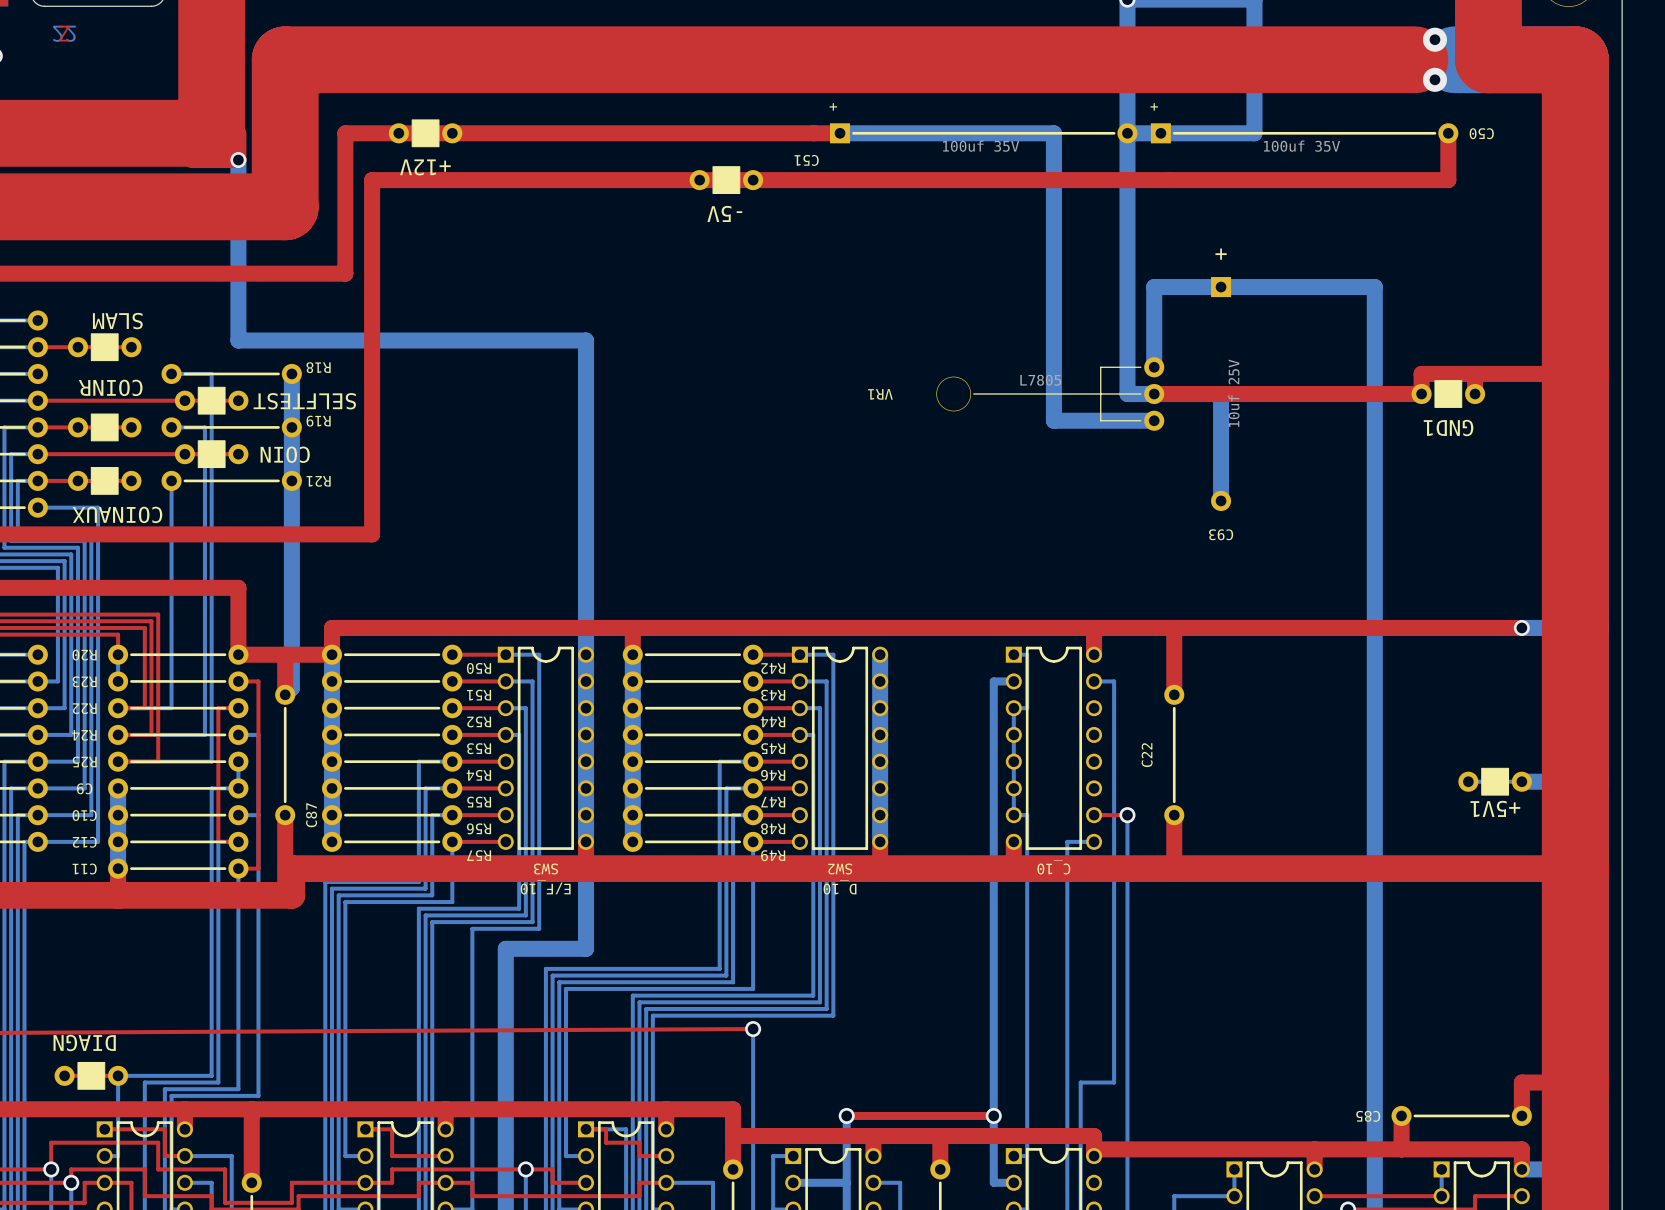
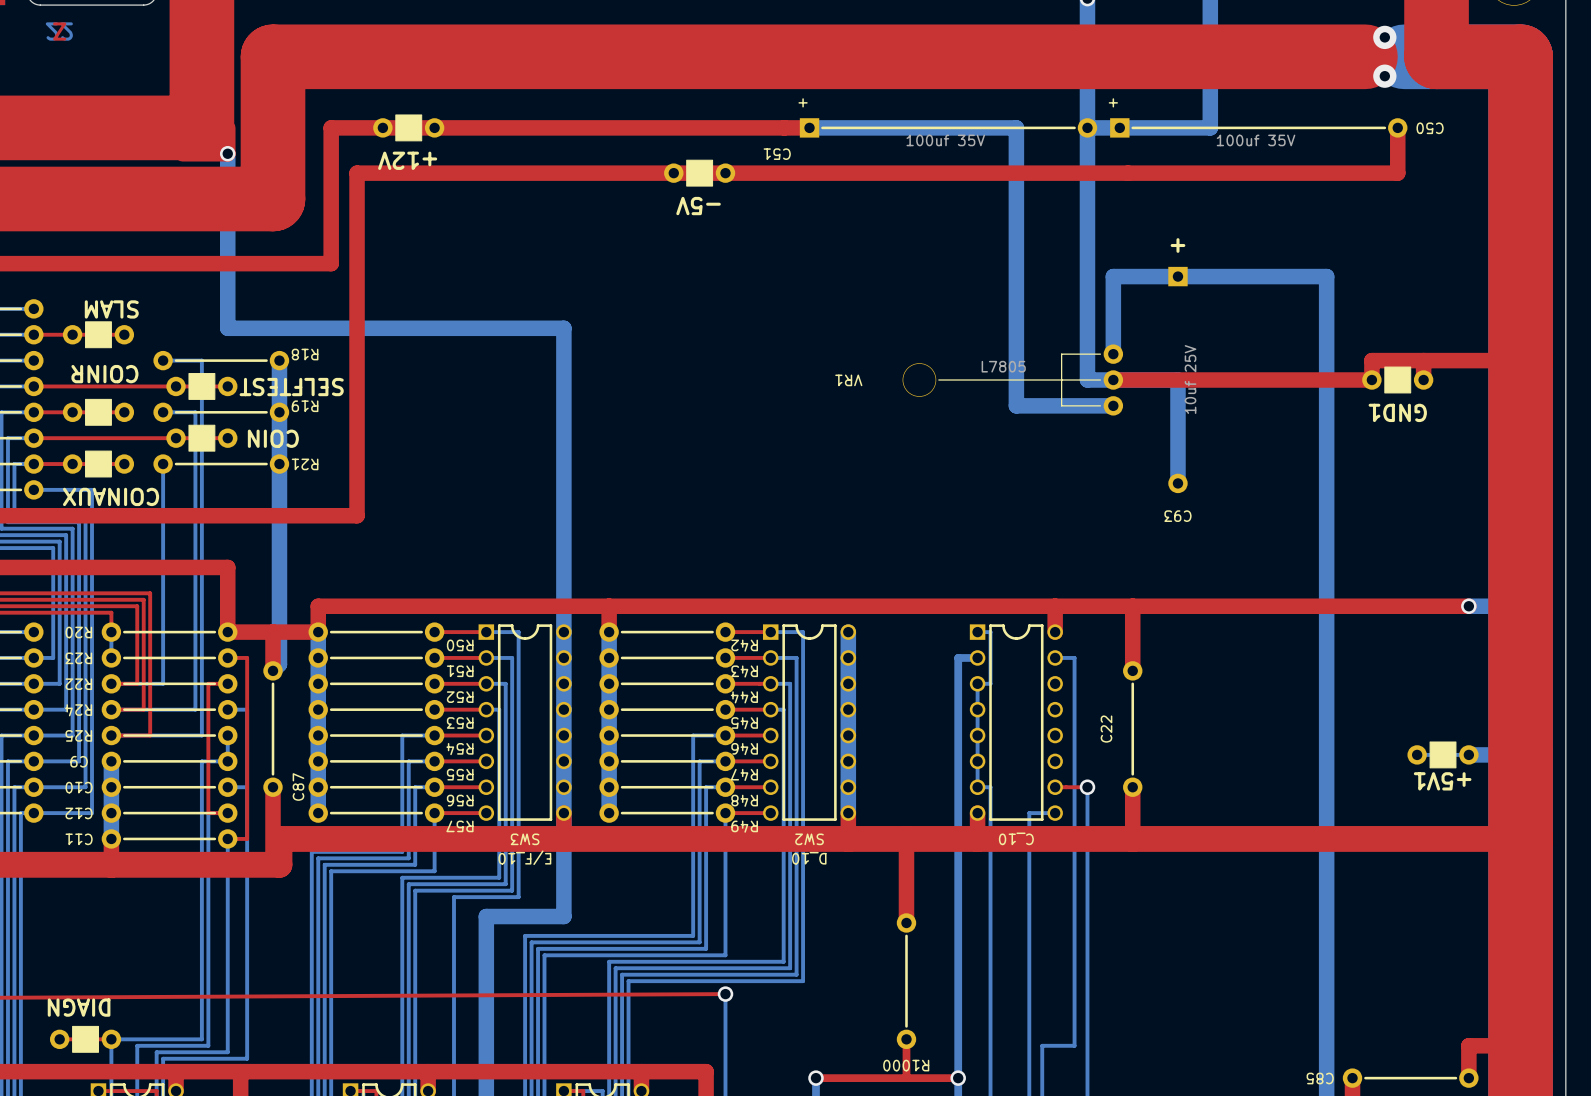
top track: none -> (906, 838) (906, 922)
R1000: none -> (906, 981)
top track: none -> (906, 1039) (906, 1078)

